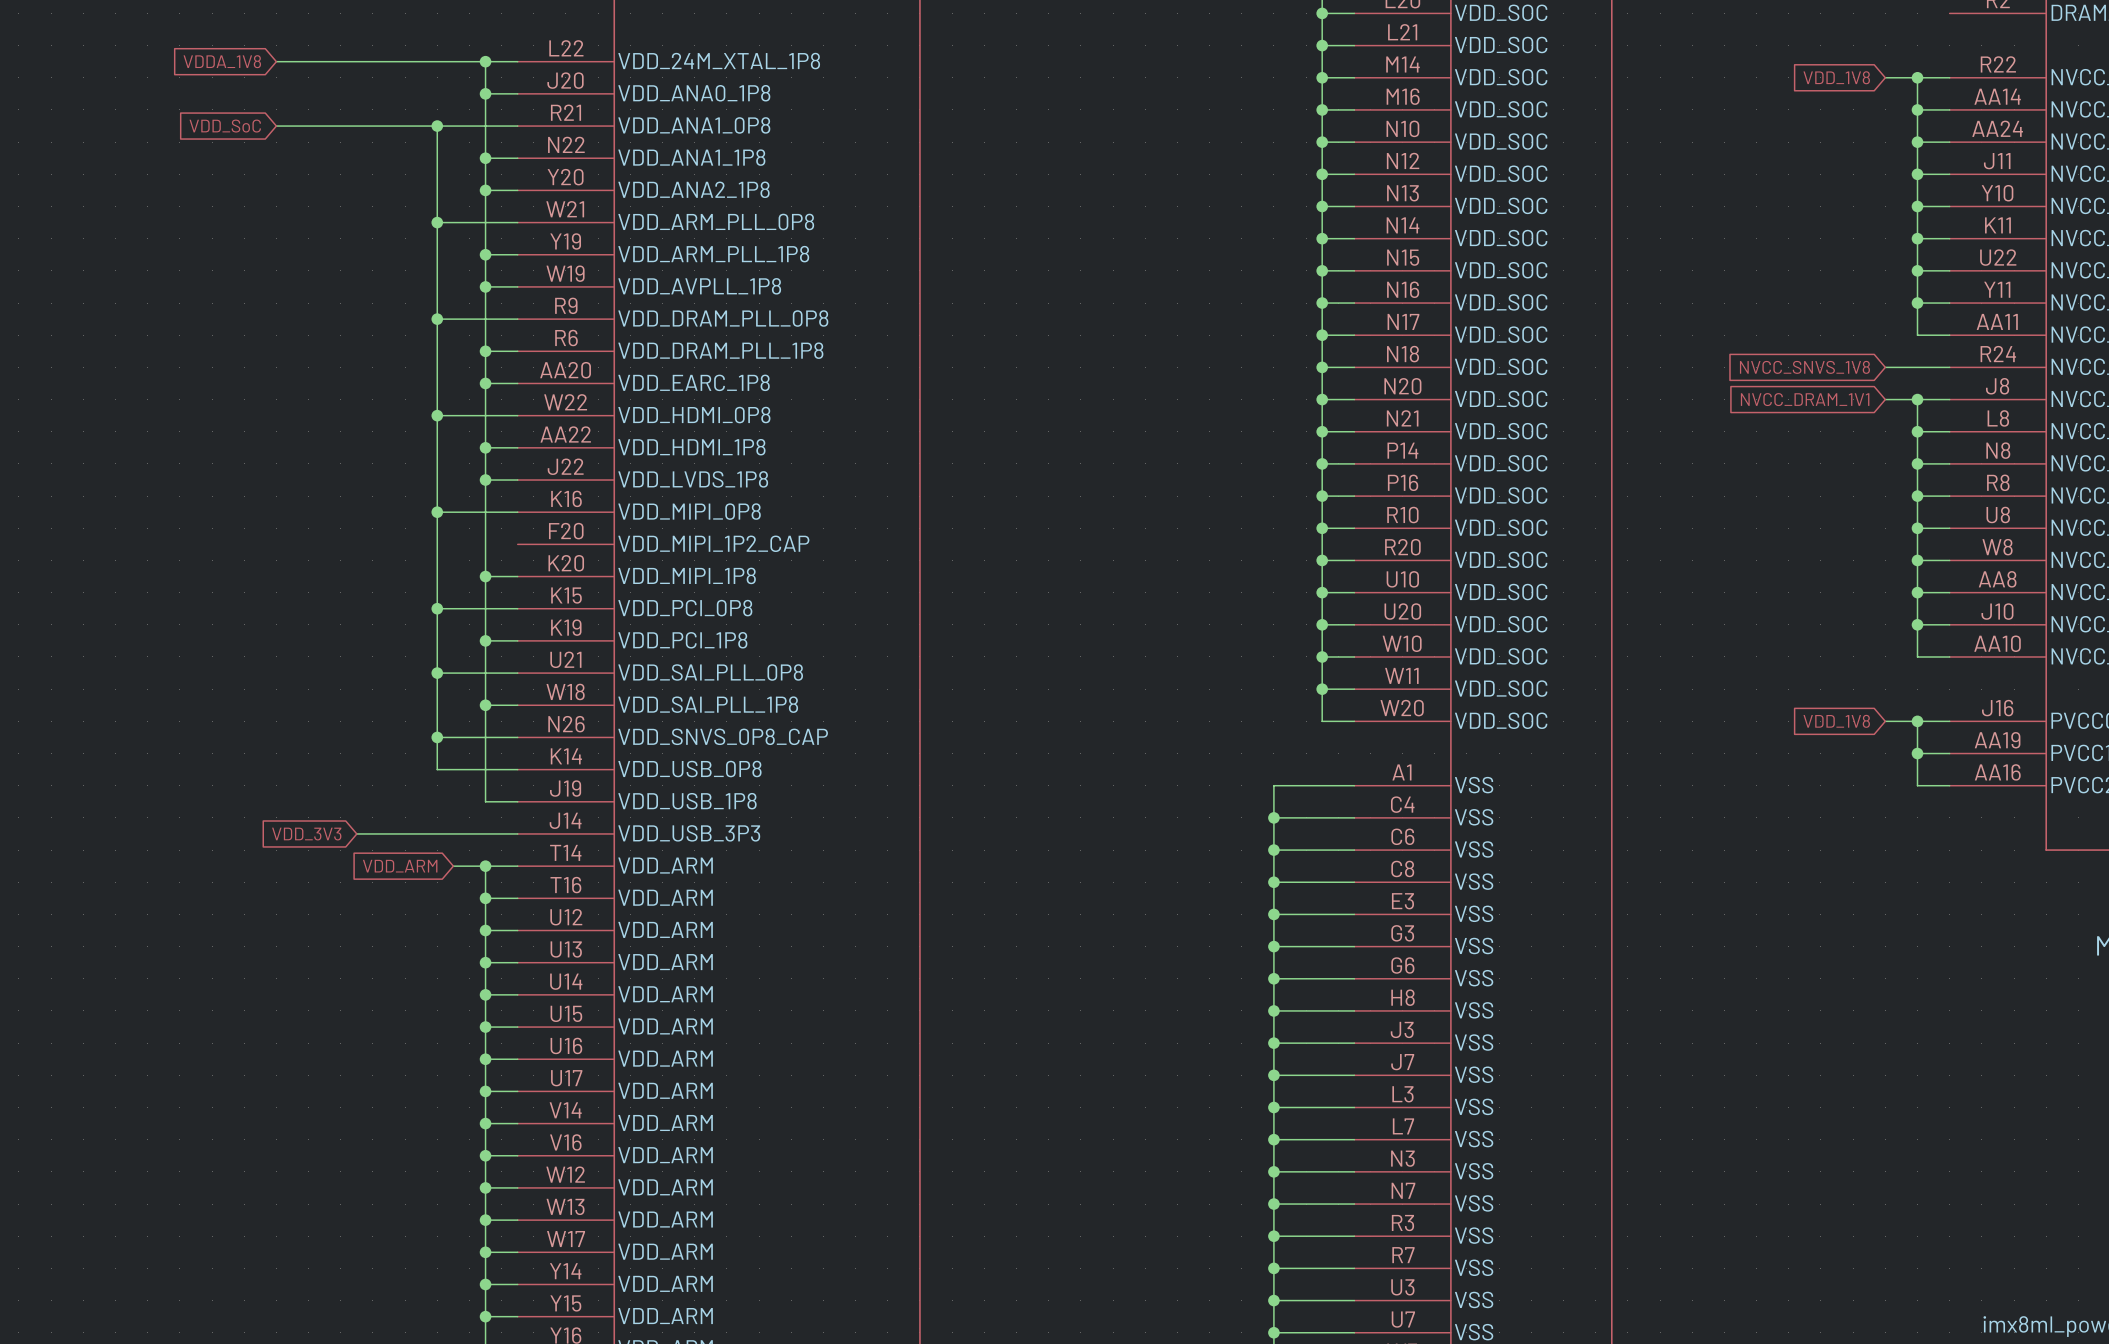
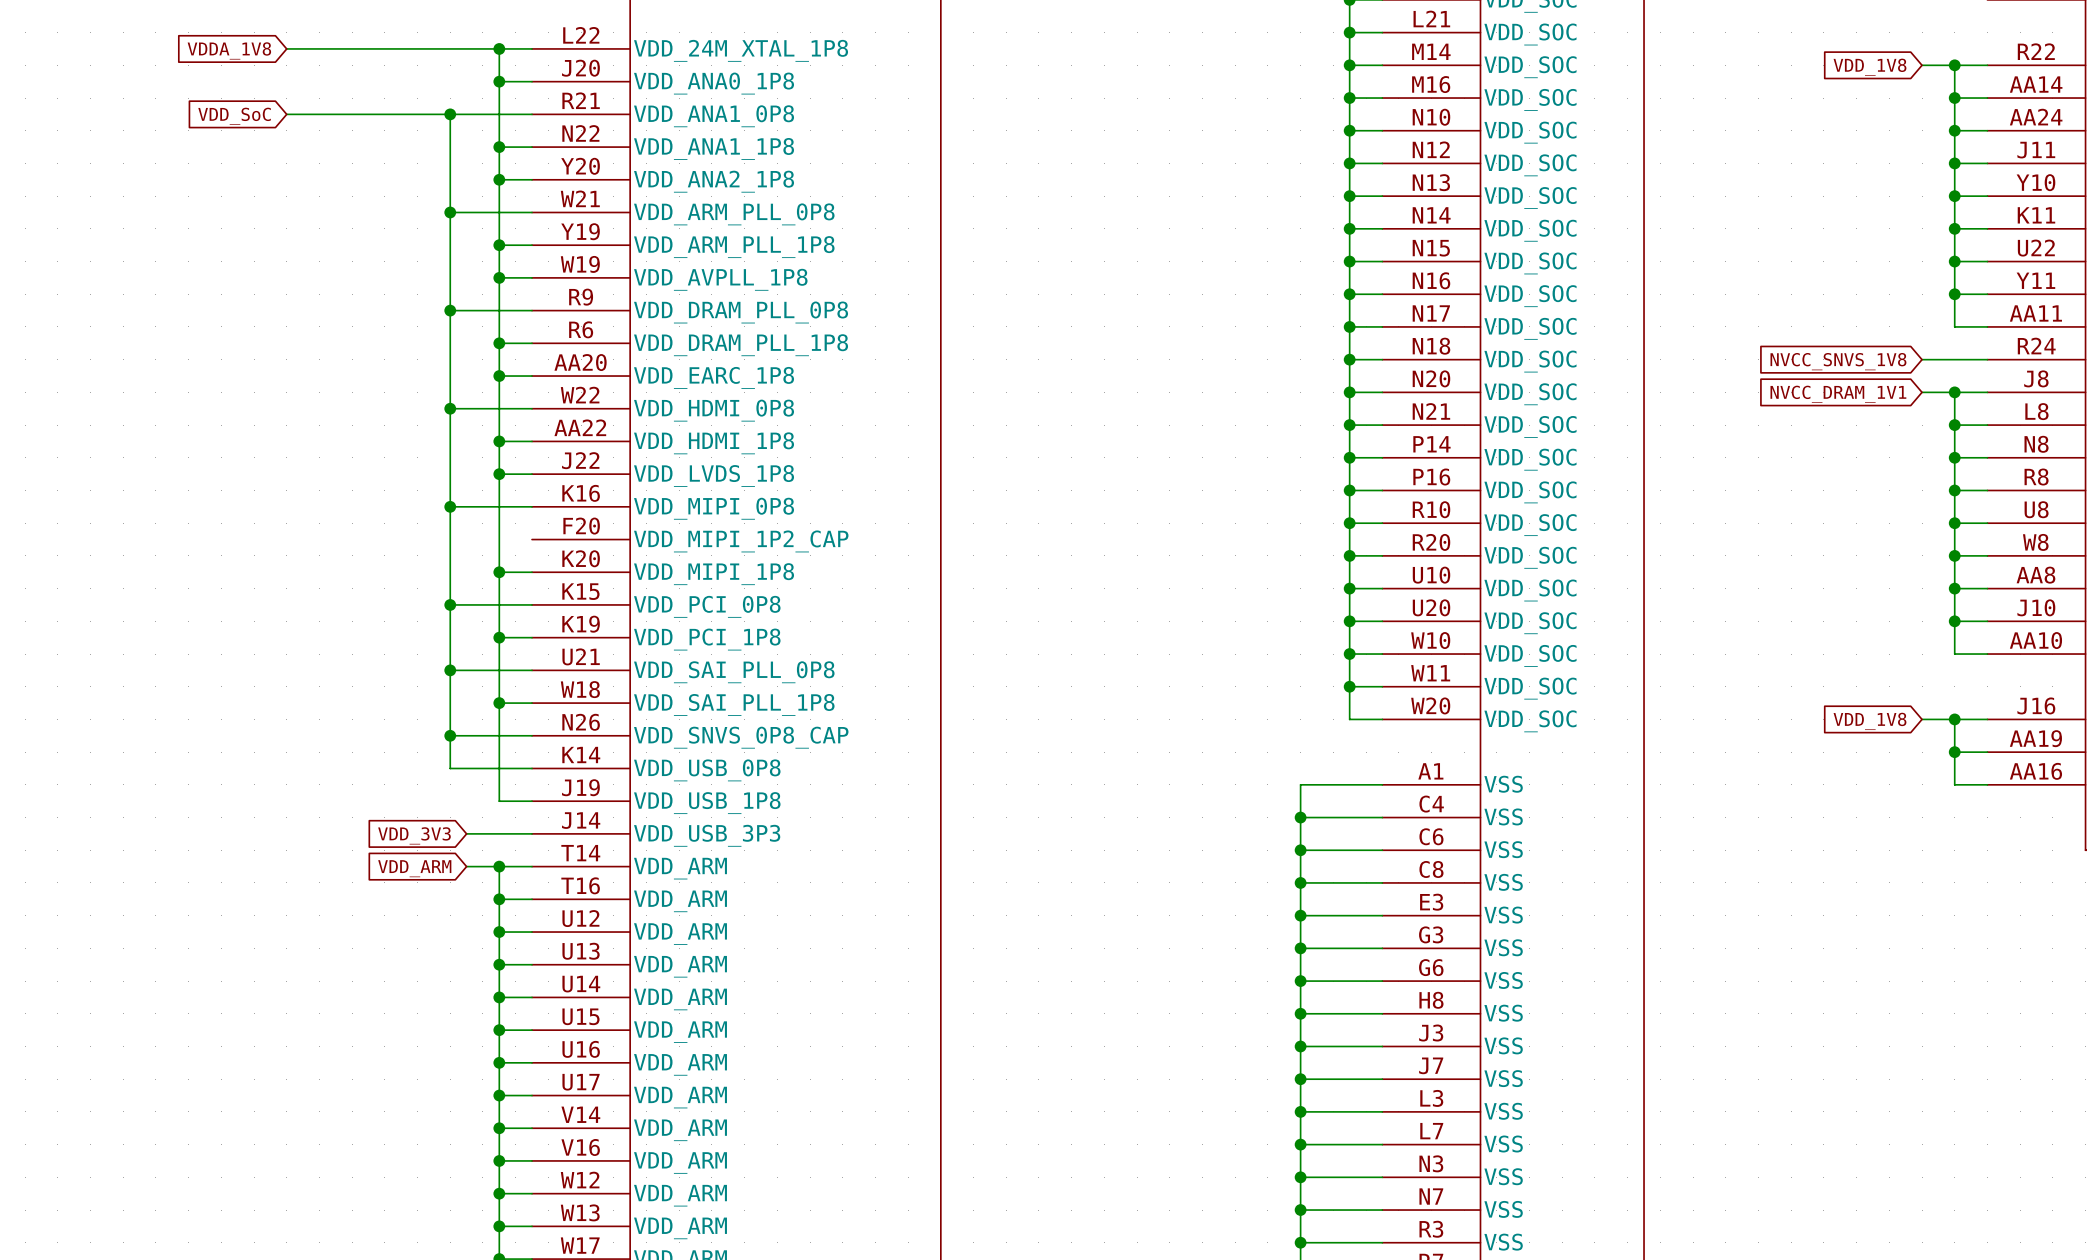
wire: (356, 833) (453, 833) -> none
global label position: VDD_3V3 (306, 834) -> VDD_3V3 (414, 835)

